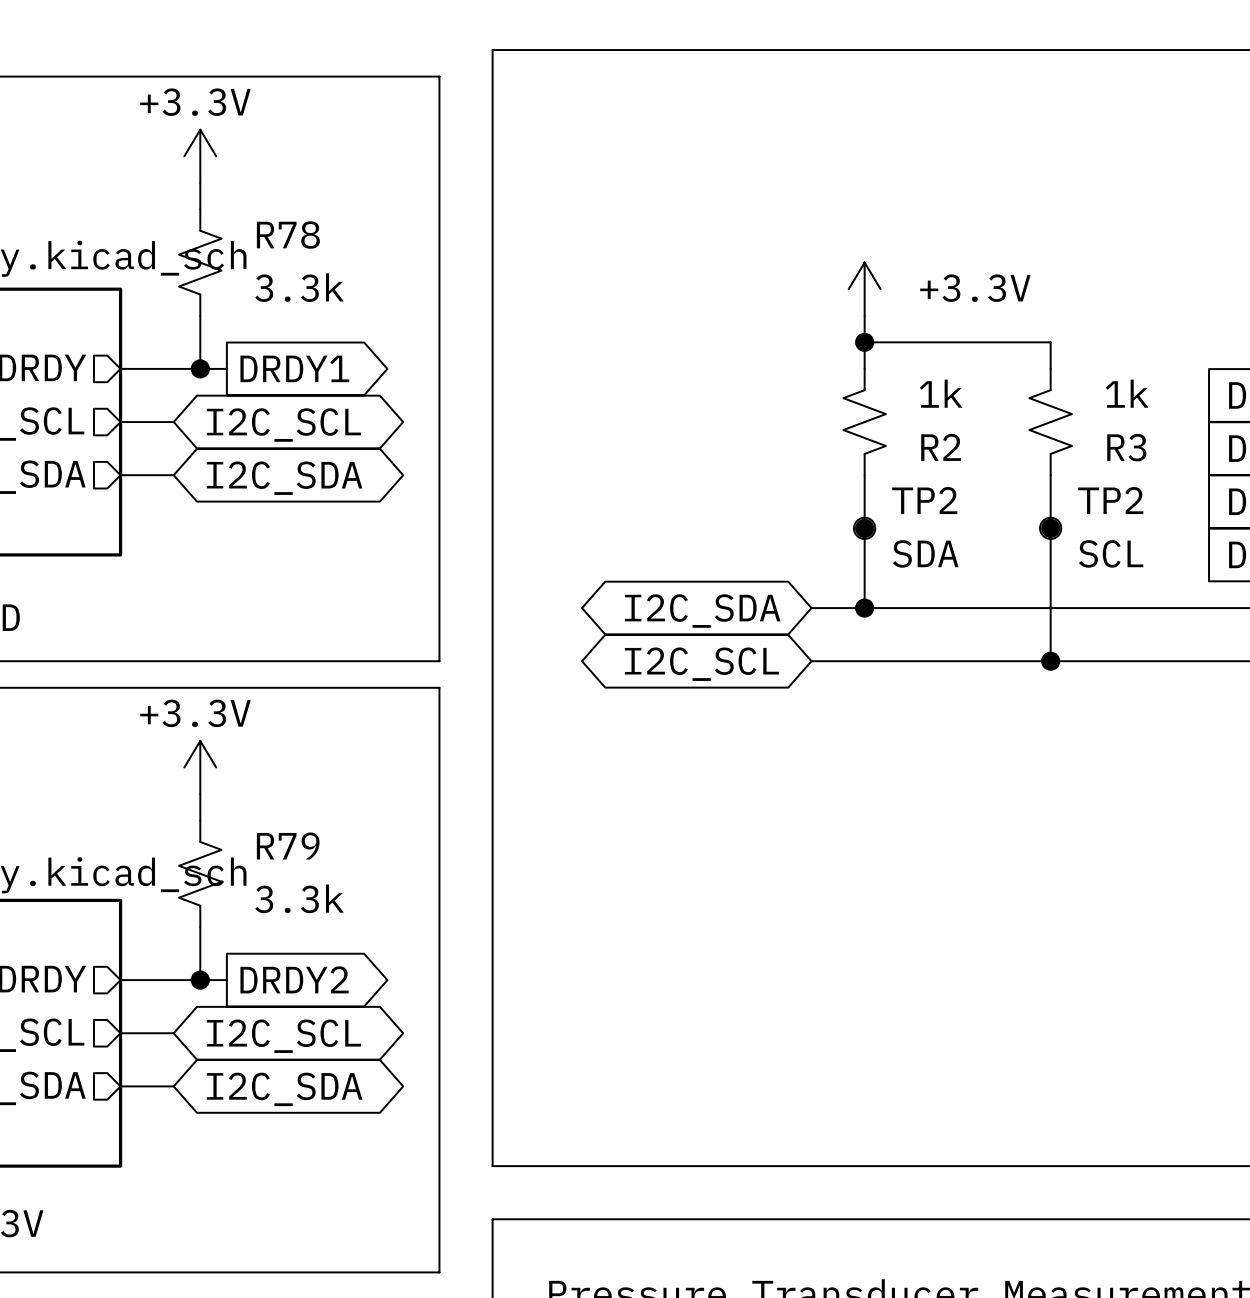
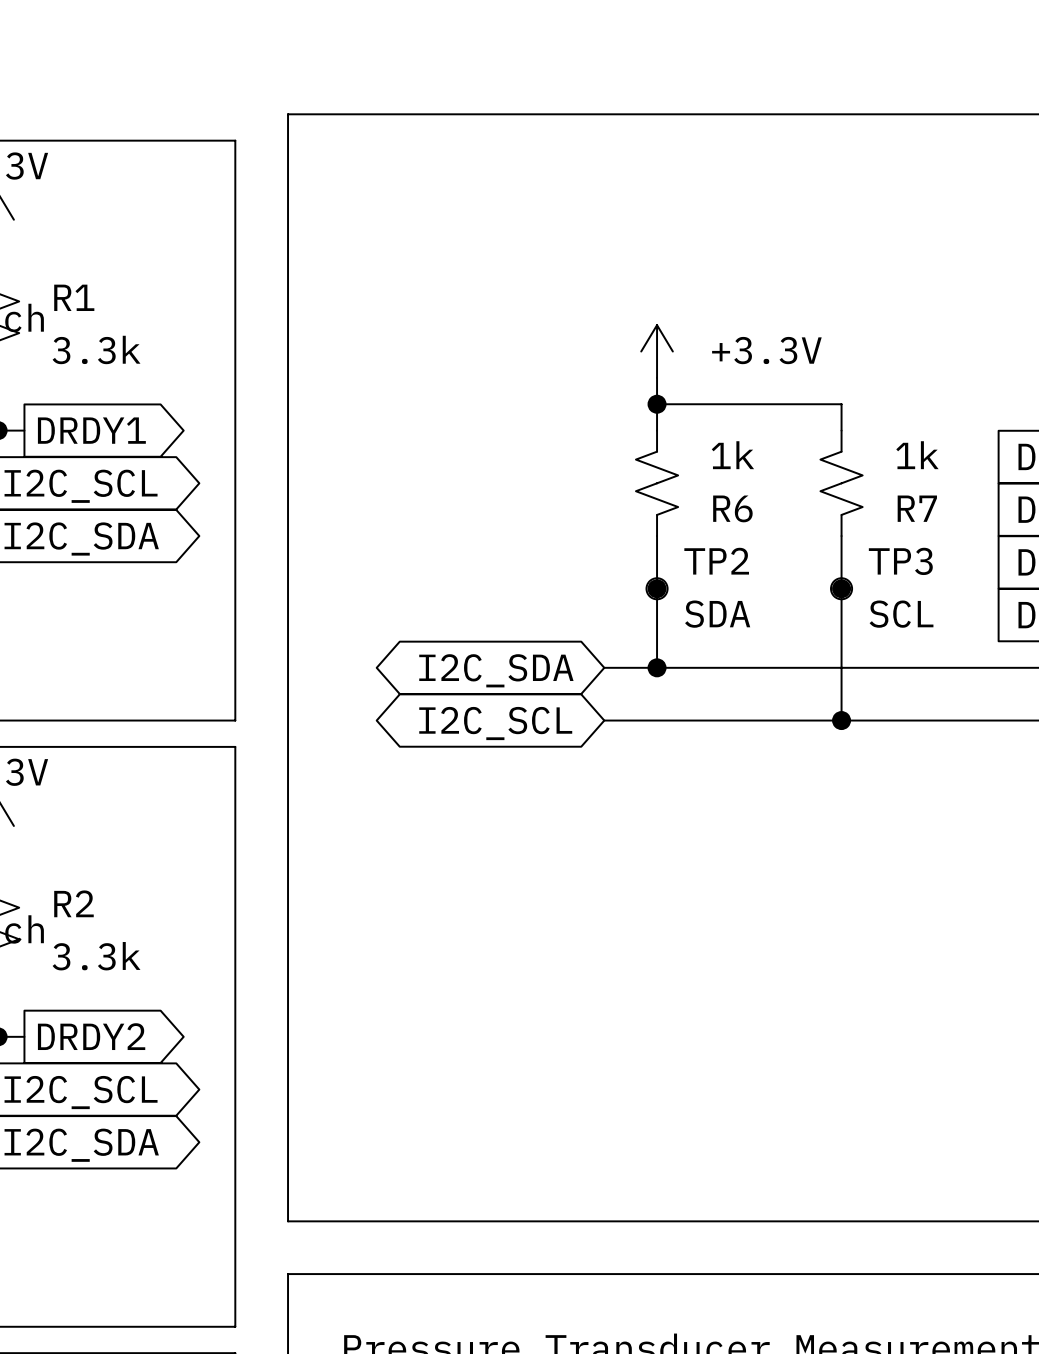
R78 name: R78 (288, 235) -> R1 (74, 297)
R2 name: R2 (941, 447) -> R6 (732, 508)
R3 name: R3 (1126, 447) -> R7 (917, 508)
TP2 name: TP2 (1110, 500) -> TP3 (900, 561)
R79 name: R79 (288, 846) -> R2 (73, 903)

